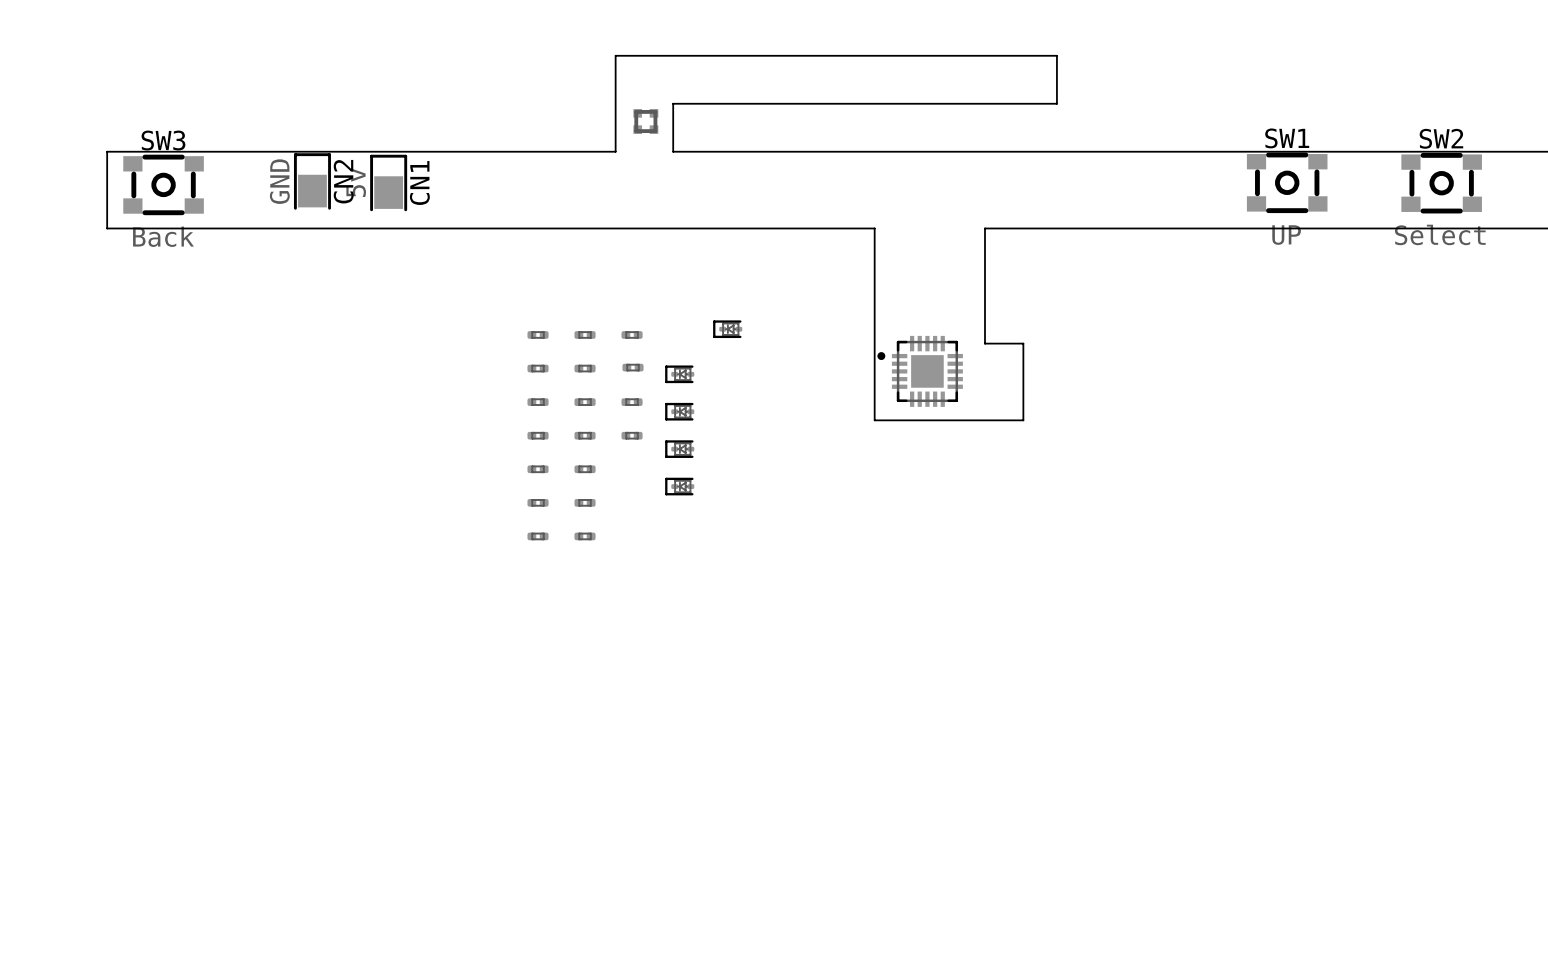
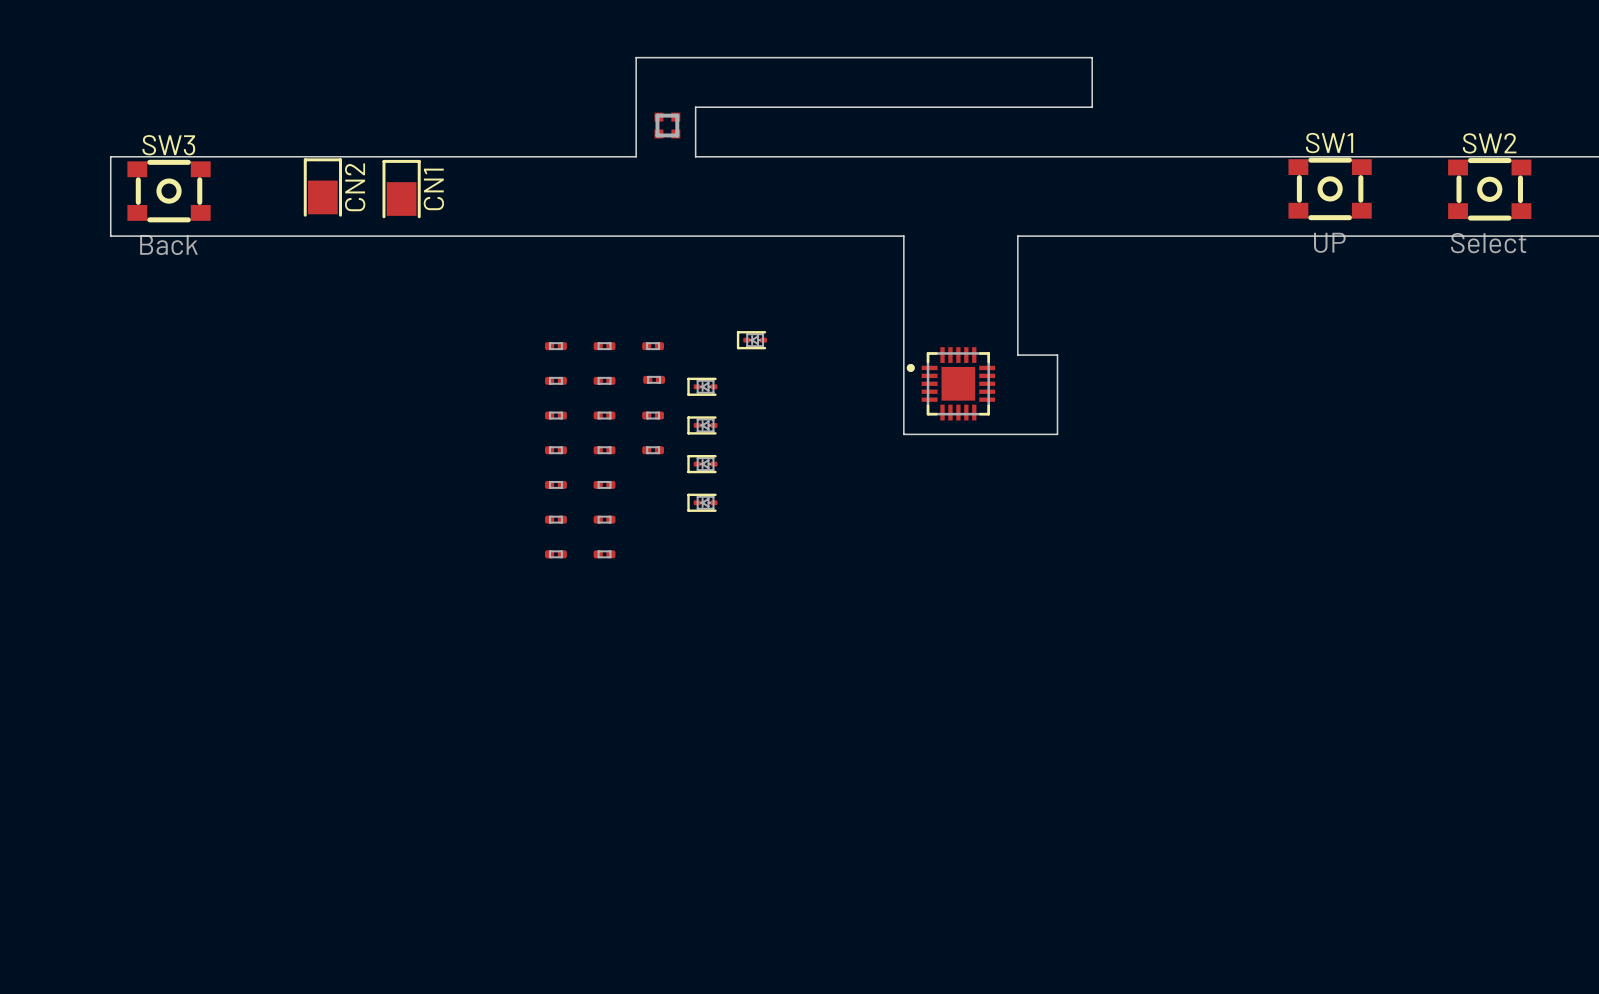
CN2 value: GND (279, 181) -> none
CN1 value: 5v (356, 182) -> none

